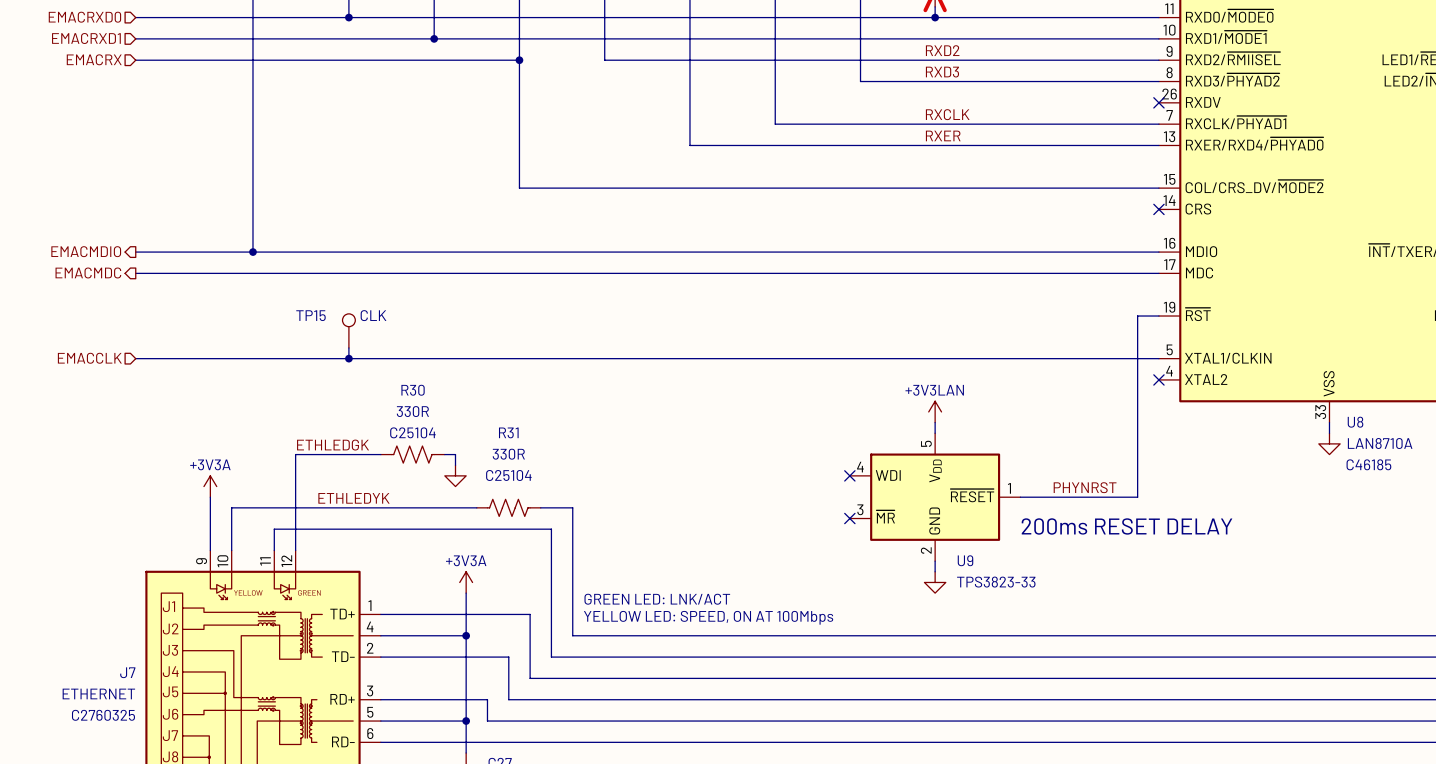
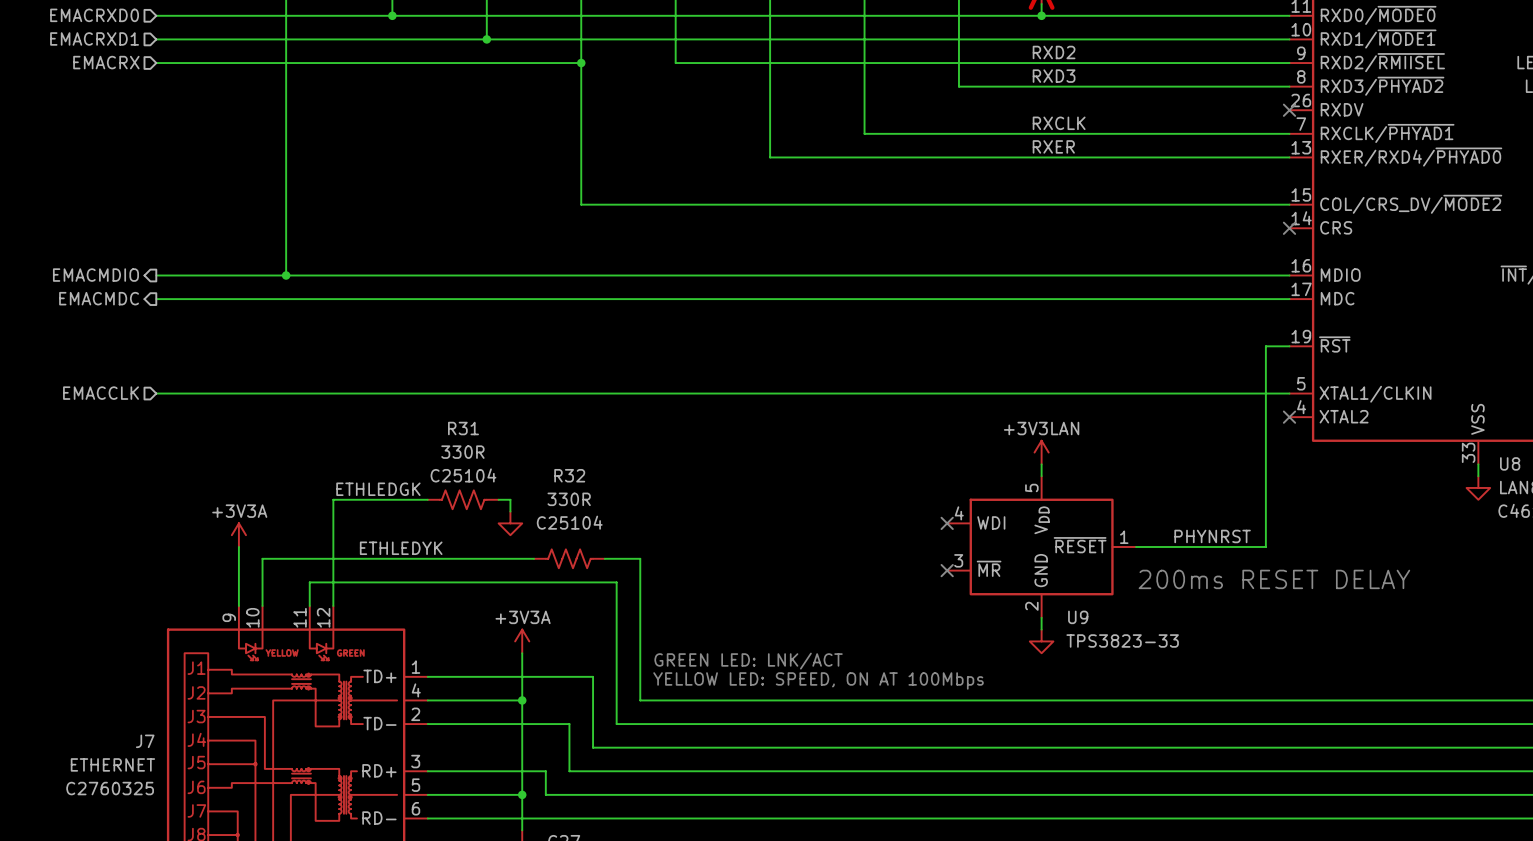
TP15: CLK (348, 330) -> none
wire: (348, 347) (348, 358) -> none
junction: (348, 358) -> none
R30 name: R30 (413, 390) -> R31 (463, 428)
R31 name: R31 (508, 432) -> R32 (569, 475)

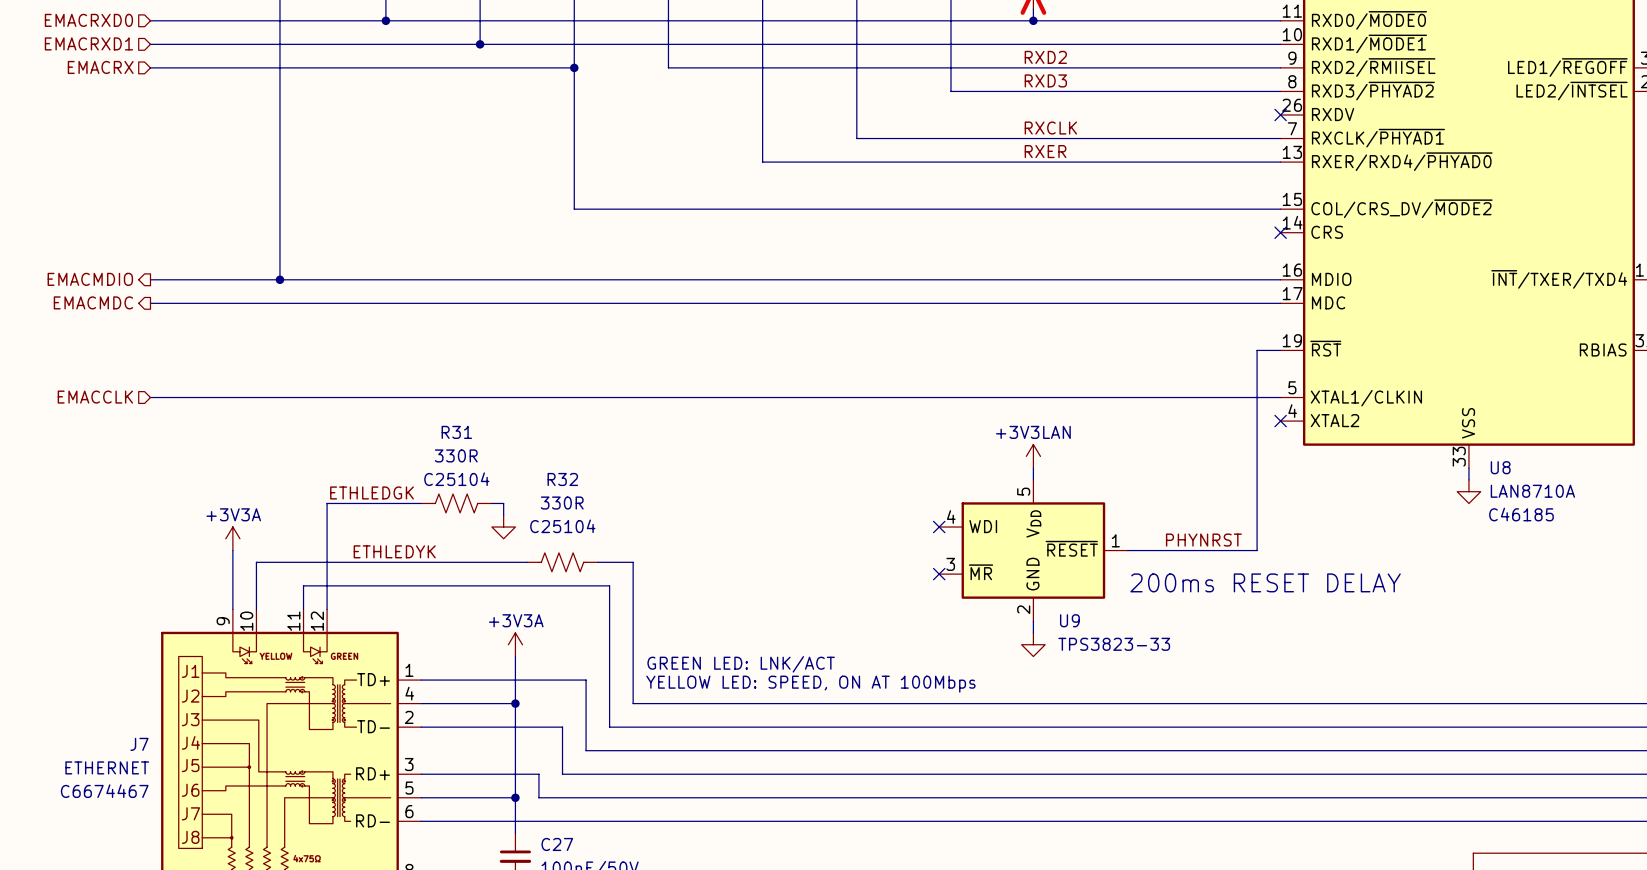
J7 text: C2760325 (110, 788) -> C6674467 (104, 791)

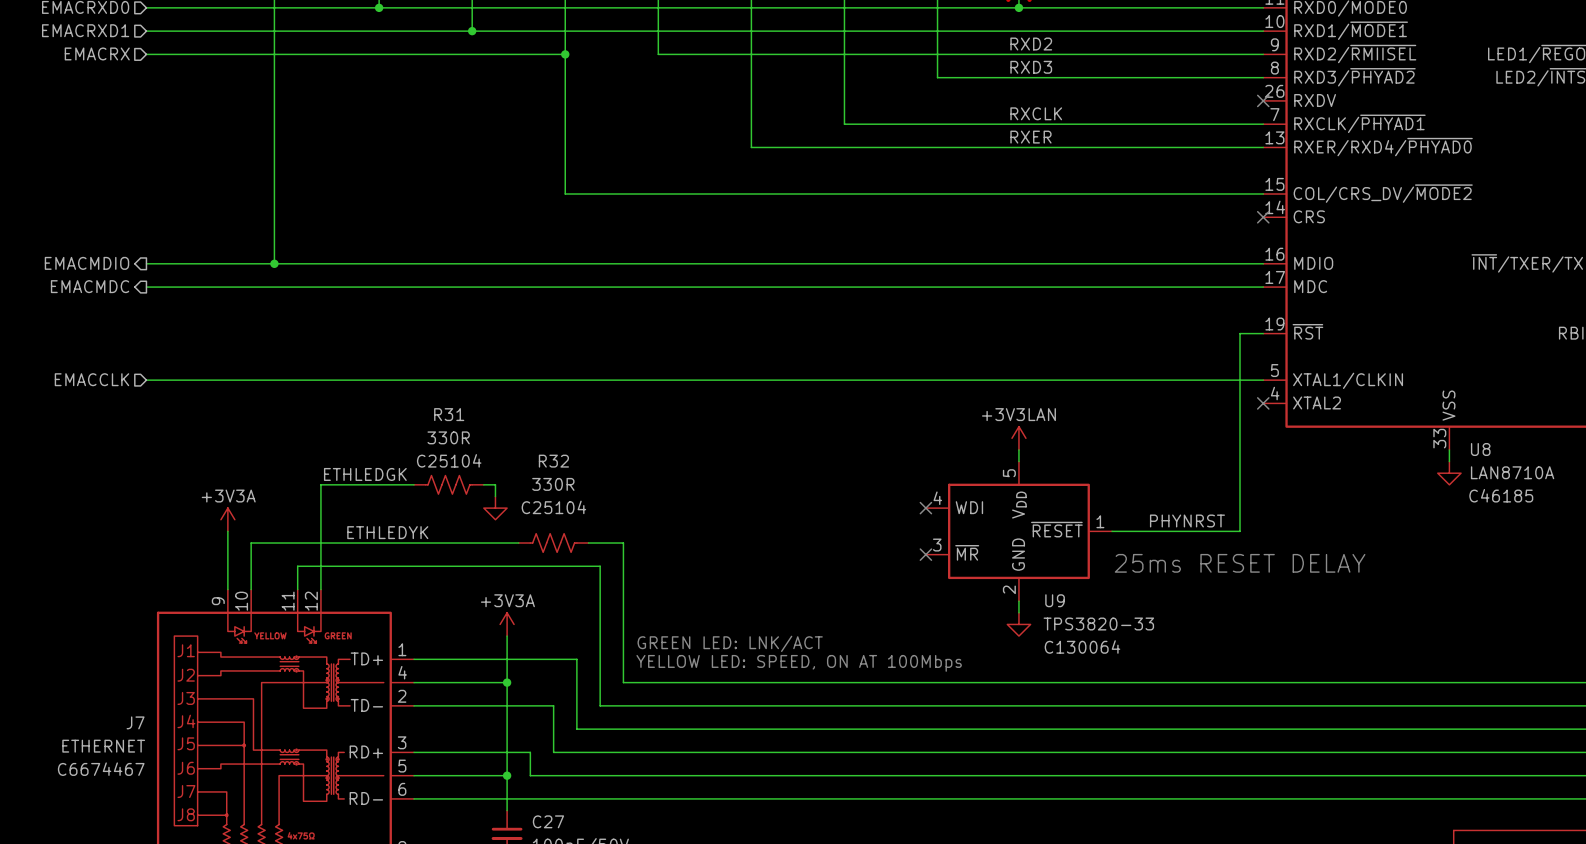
text: 200ms RESET DELAY (1265, 582) -> 25ms RESET DELAY (1240, 563)
U9 value: TPS3823-33 (1114, 644) -> TPS3820-33 (1098, 624)
U9 text: none -> C130064 (1082, 646)

